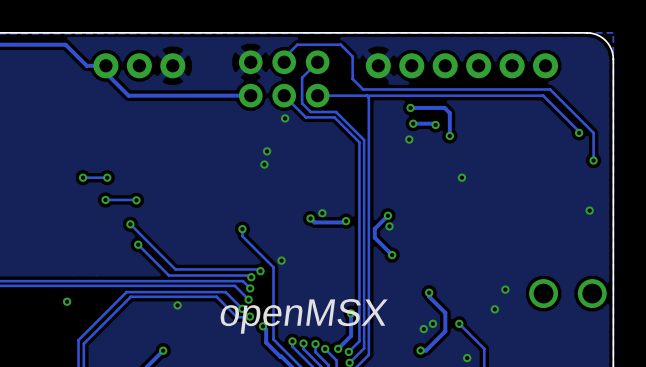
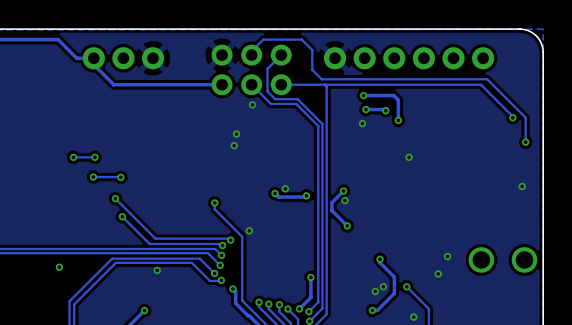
text: openMSX (303, 316) -> none

